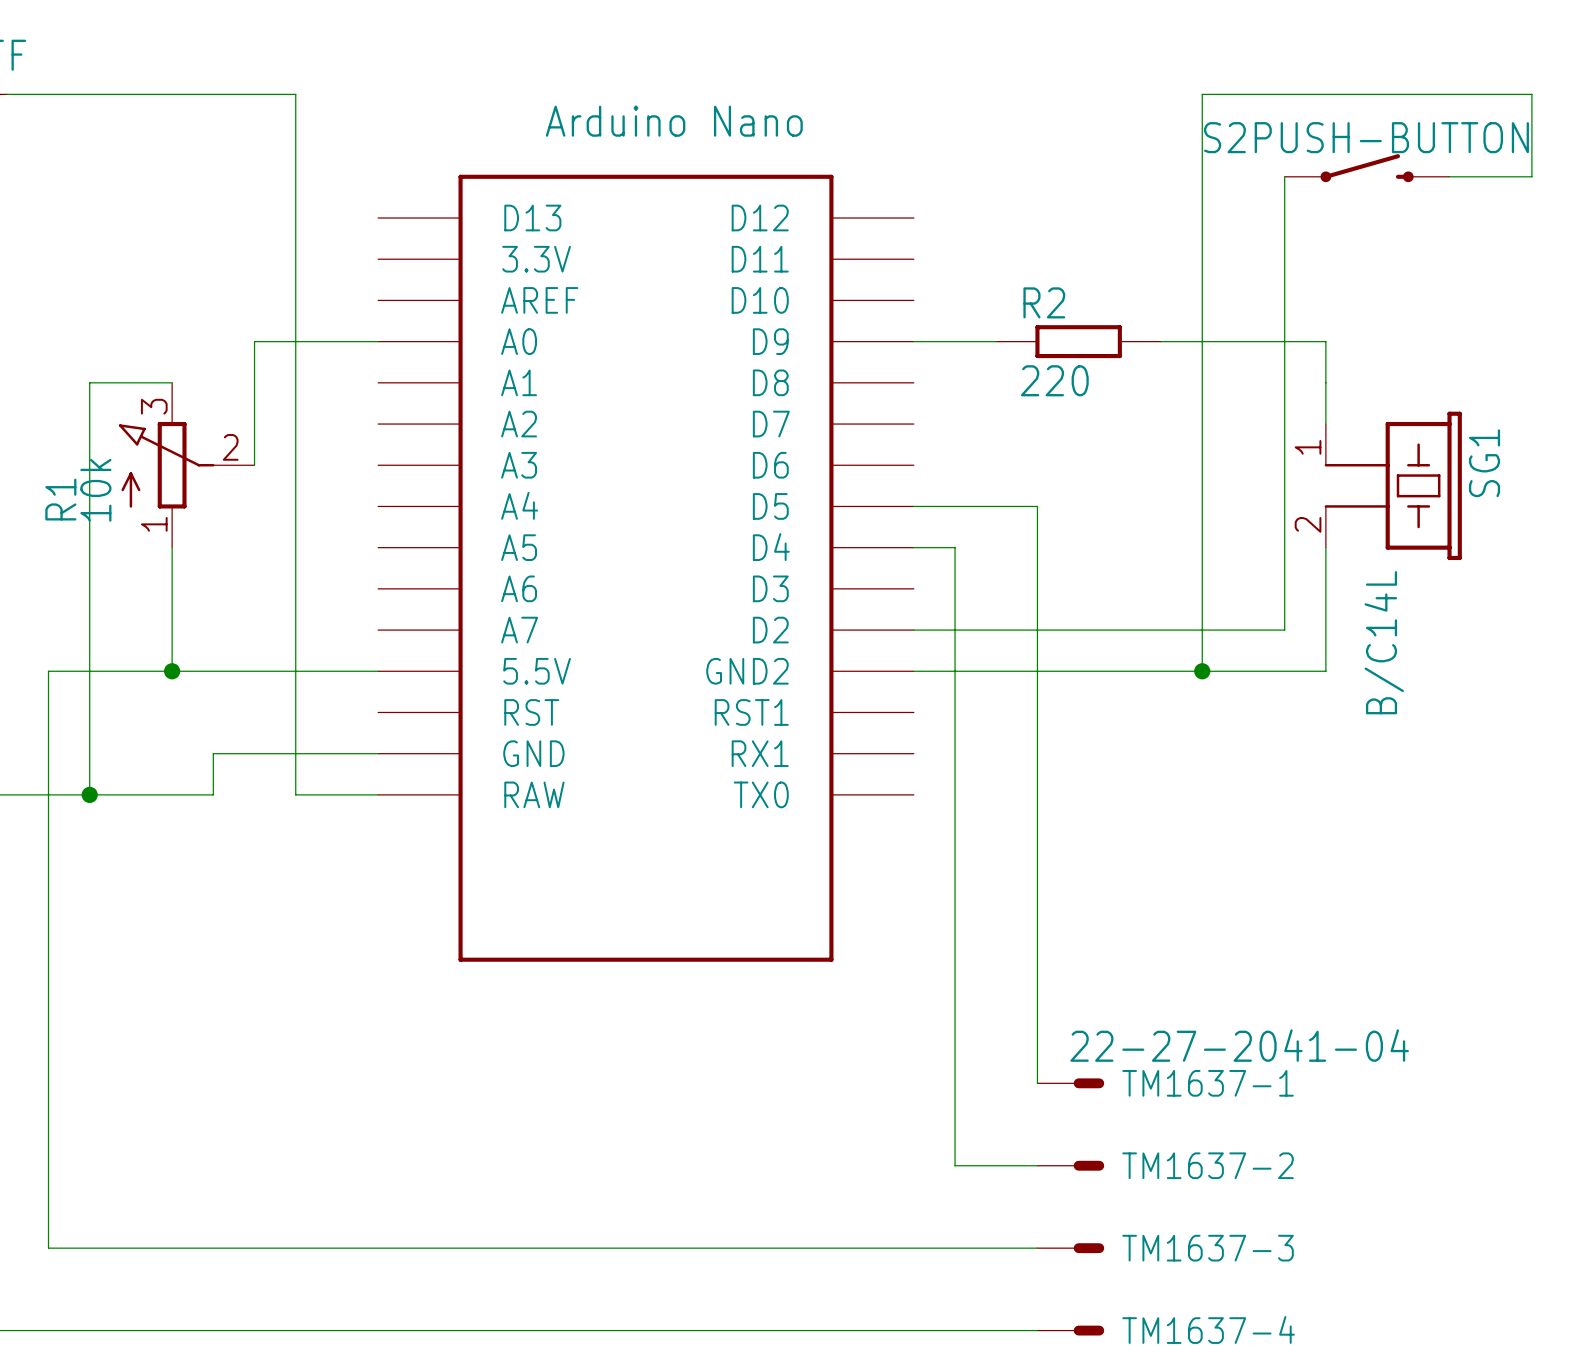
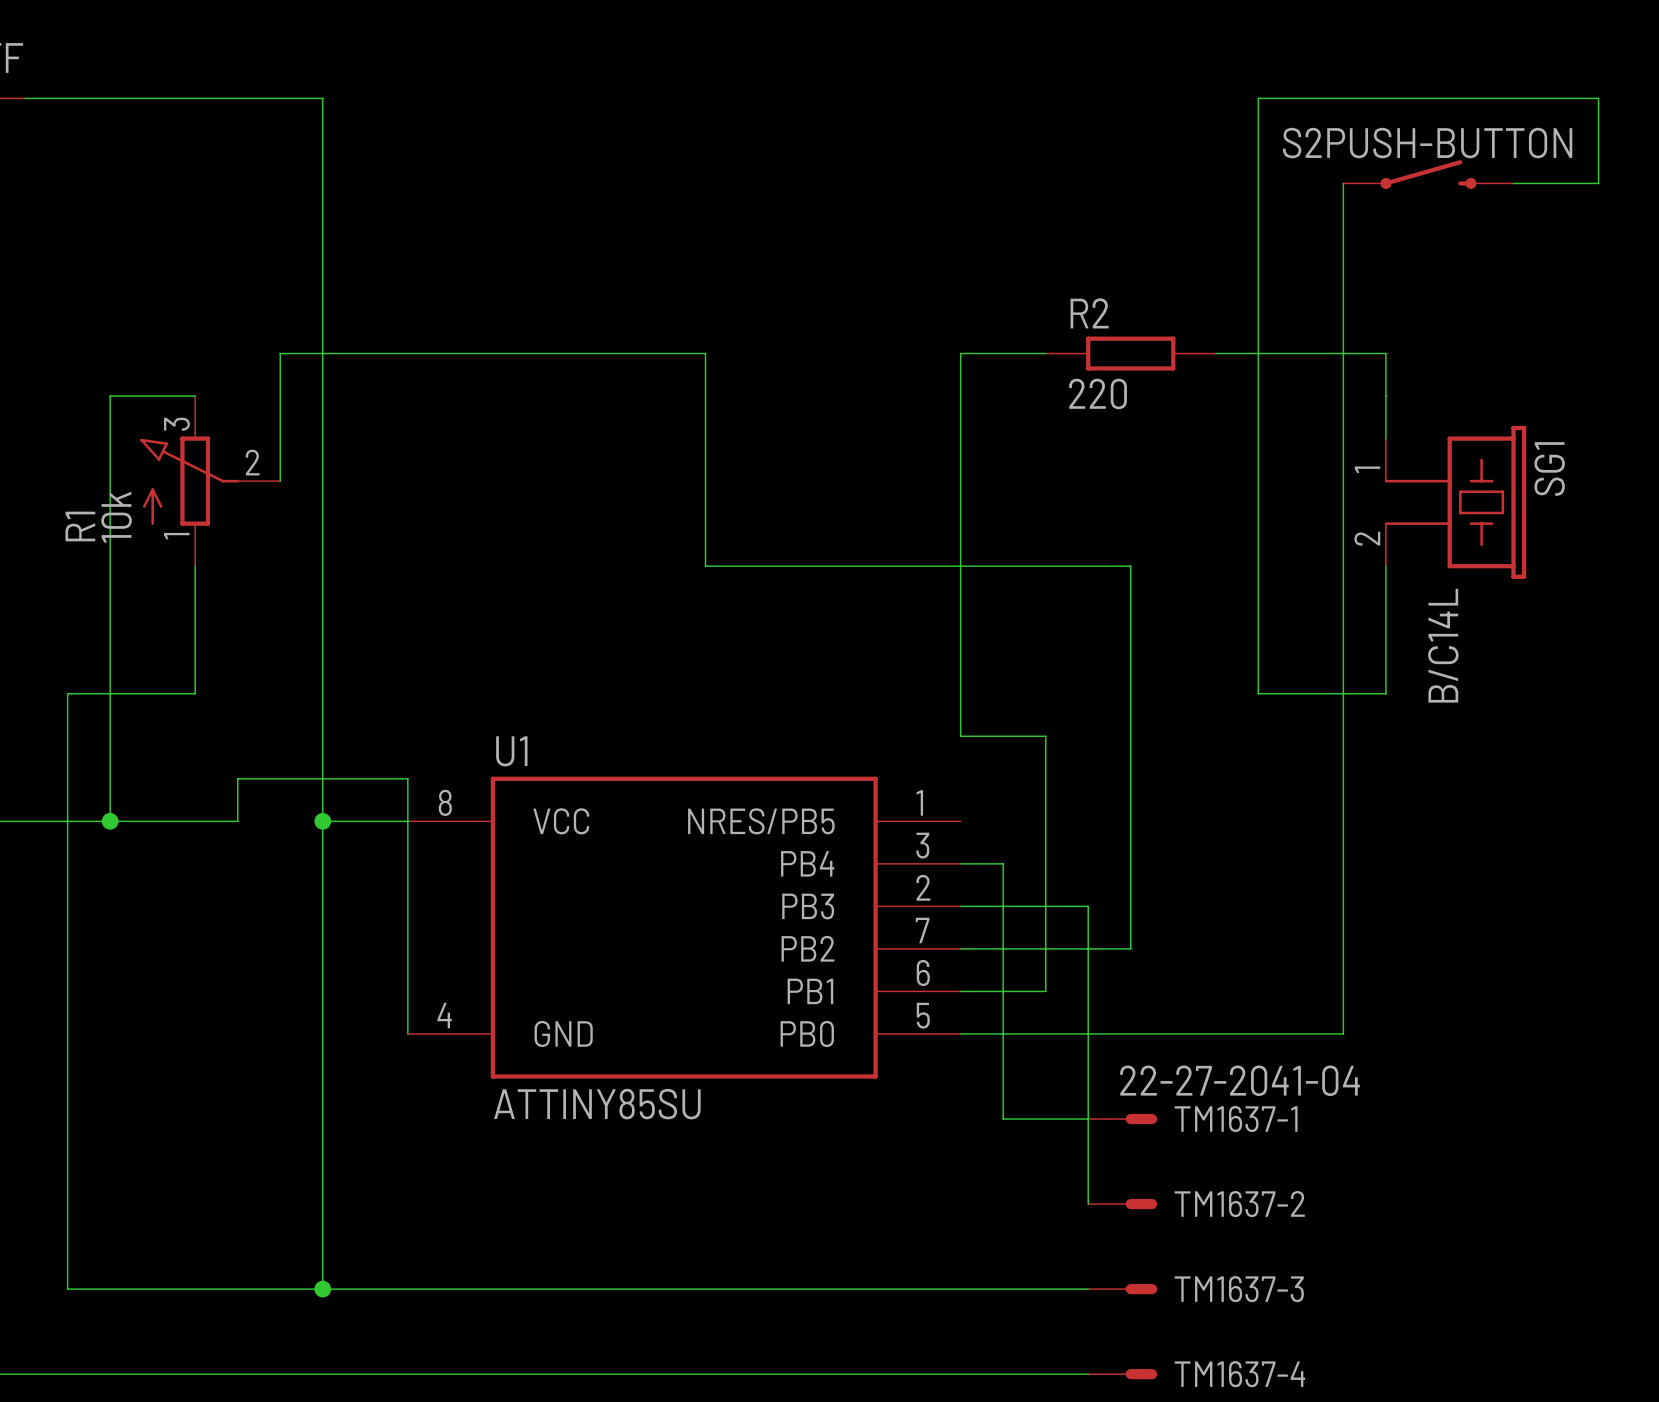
wire: none -> (407, 353) (705, 353) (705, 566) (960, 566)
wire: none -> (960, 353) (960, 736) (1045, 736) (1045, 991) (960, 991)
wire: (913, 506) (1037, 506) (1037, 877) -> (960, 906) (1088, 906)
wire: (955, 547) (955, 836) -> (1003, 566) (1130, 566) (1130, 948) (960, 948)
part: (645, 568) -> none
wire: (913, 630) (1284, 630) -> (960, 1033) (1343, 1033) (1343, 651)
wire: (172, 671) (378, 671) -> none
junction: (172, 671) -> none
wire: (913, 671) (1202, 671) -> none
junction: (1202, 671) -> none
wire: none -> (407, 778) (407, 1033)
wire: none -> (322, 821) (322, 1289)
junction: none -> (322, 821)
wire: none -> (960, 863) (1003, 863)
U1: none -> ATTINY85SU (684, 927)
wire: (955, 1083) (955, 1165) (1037, 1165) -> (1003, 1119) (1088, 1119) (1088, 1204)
junction: none -> (322, 1289)

